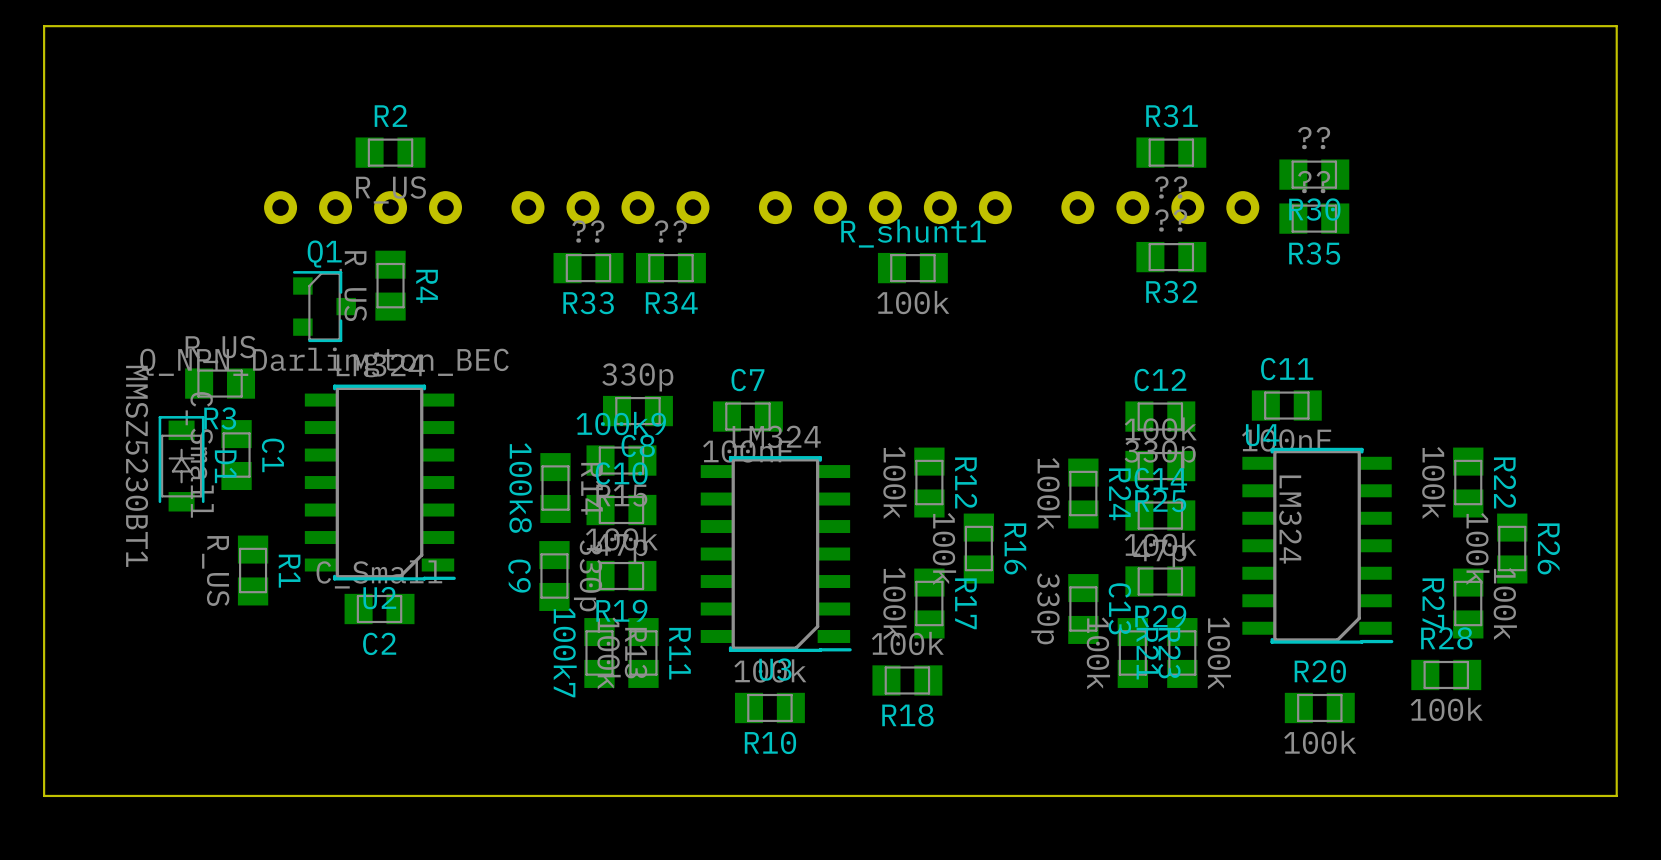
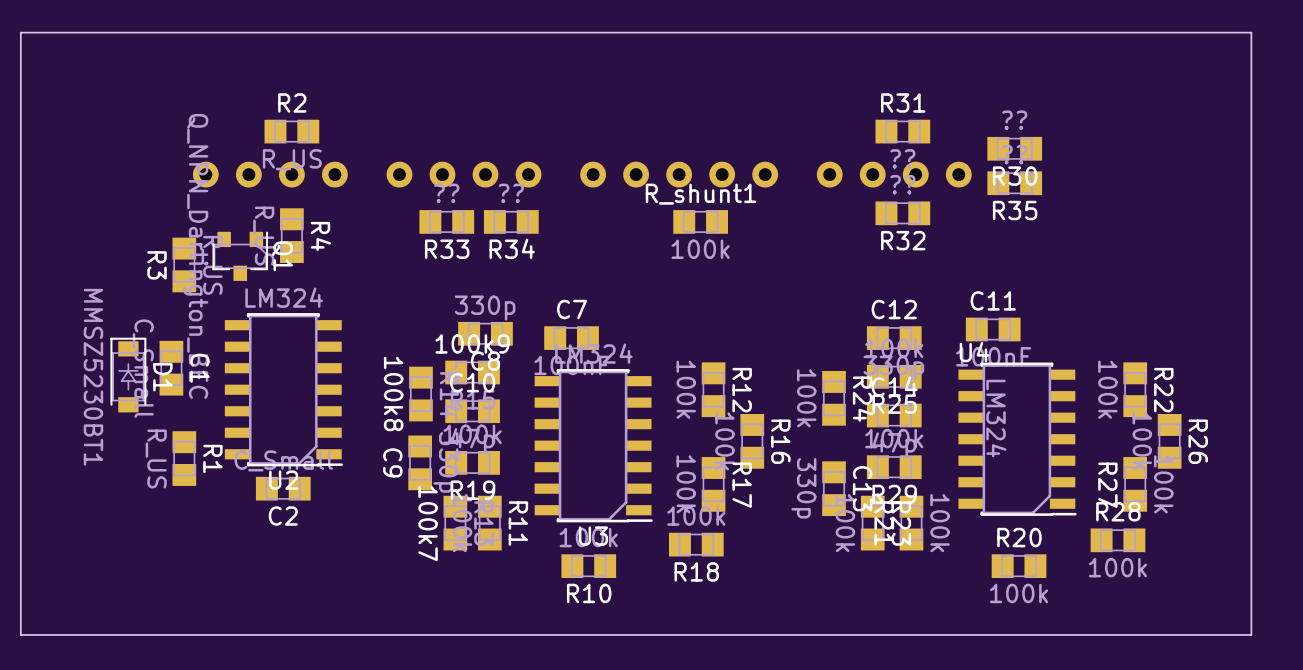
Q1 rotation: 0° (324, 306) -> 90° clockwise (240, 256)
R3 rotation: 0° (220, 383) -> 90° clockwise (184, 264)
R3 position: (220, 383) -> (184, 264)

